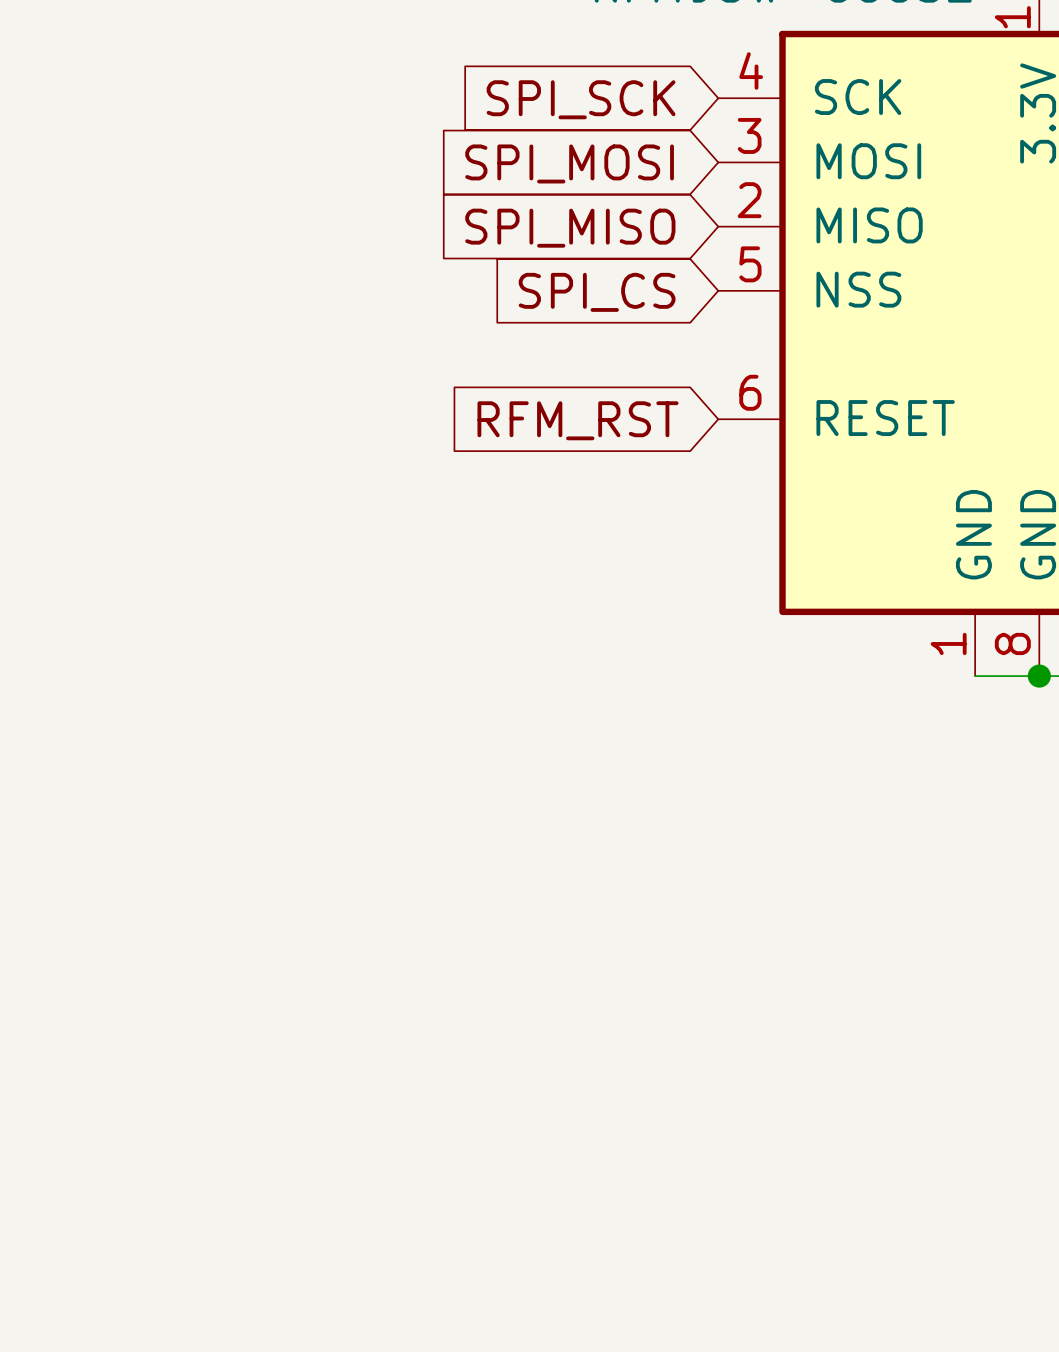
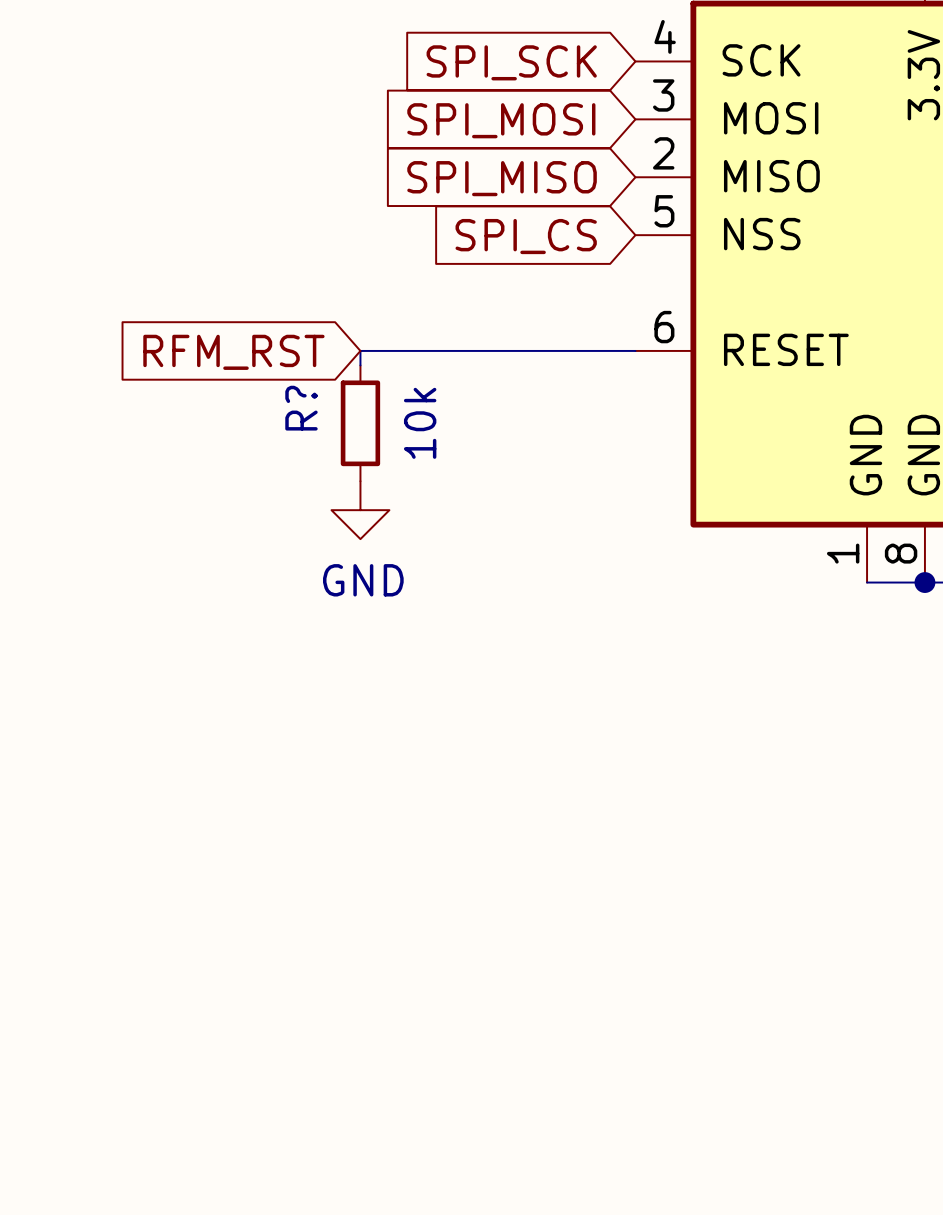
wire: none -> (635, 350) (360, 350) (360, 365)
global label position: RFM_RST (577, 420) -> RFM_RST (233, 352)
R?: none -> 10k (360, 423)
power symbol: none -> GND (360, 510)

